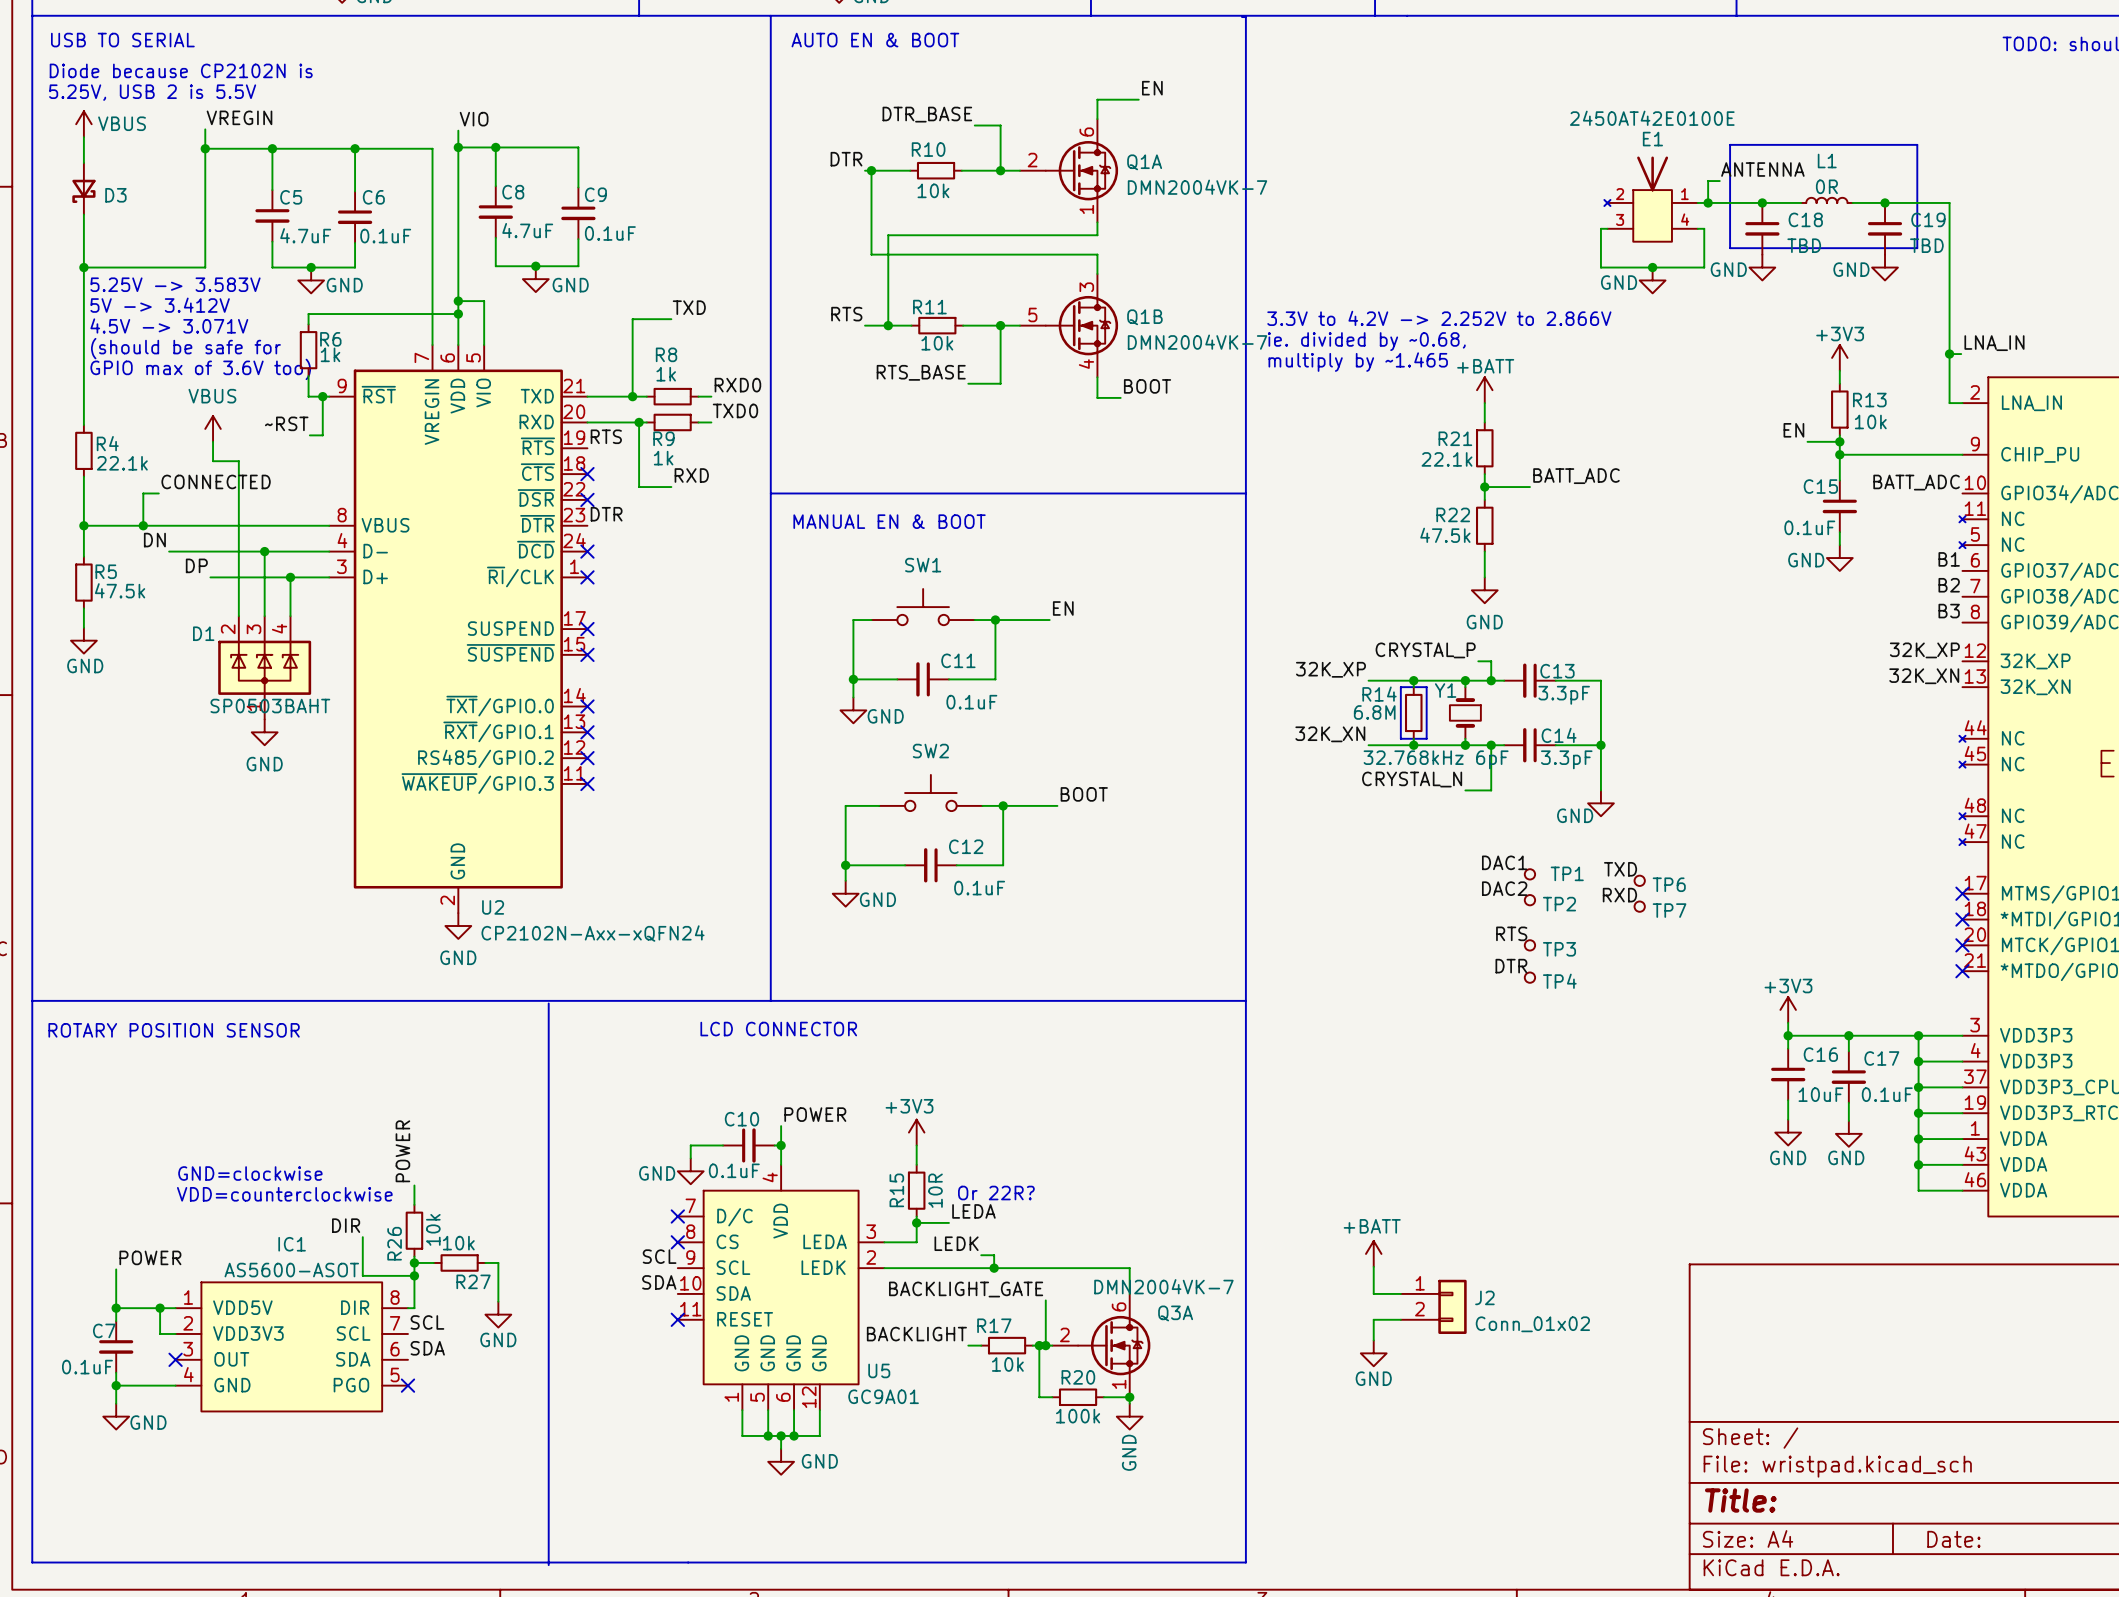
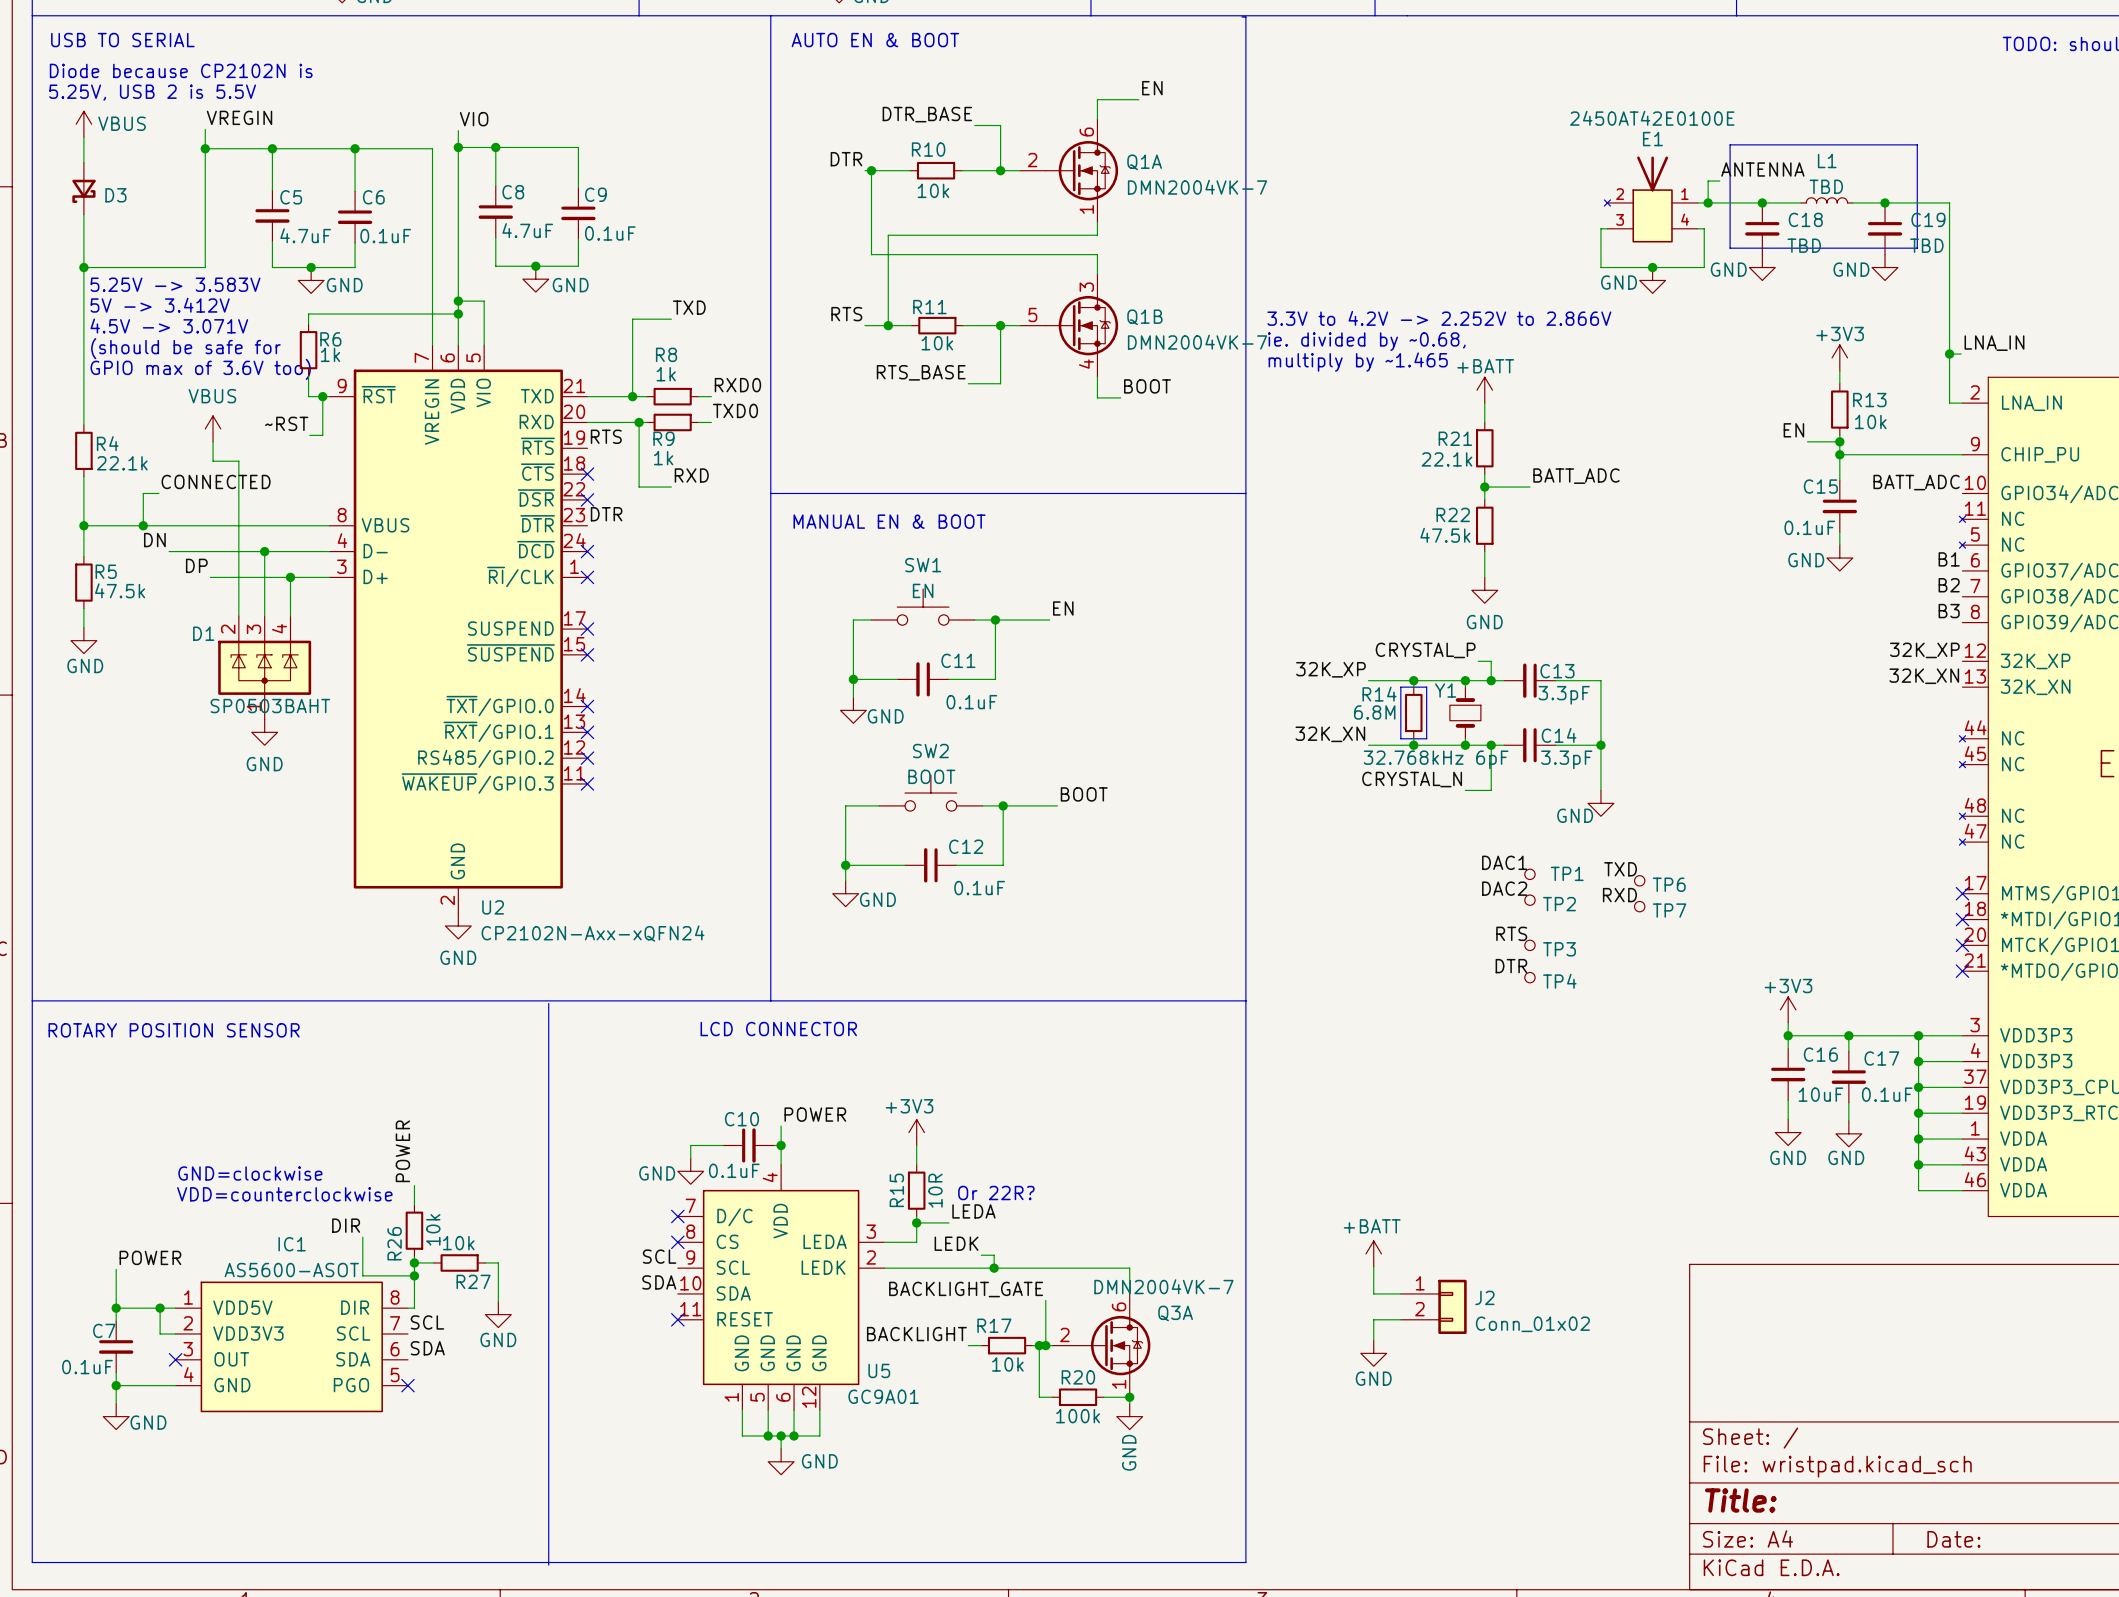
L1 value: 0R (1826, 186) -> TBD (1826, 186)
SW1 value: none -> EN (923, 590)
SW2 value: none -> BOOT (931, 776)

